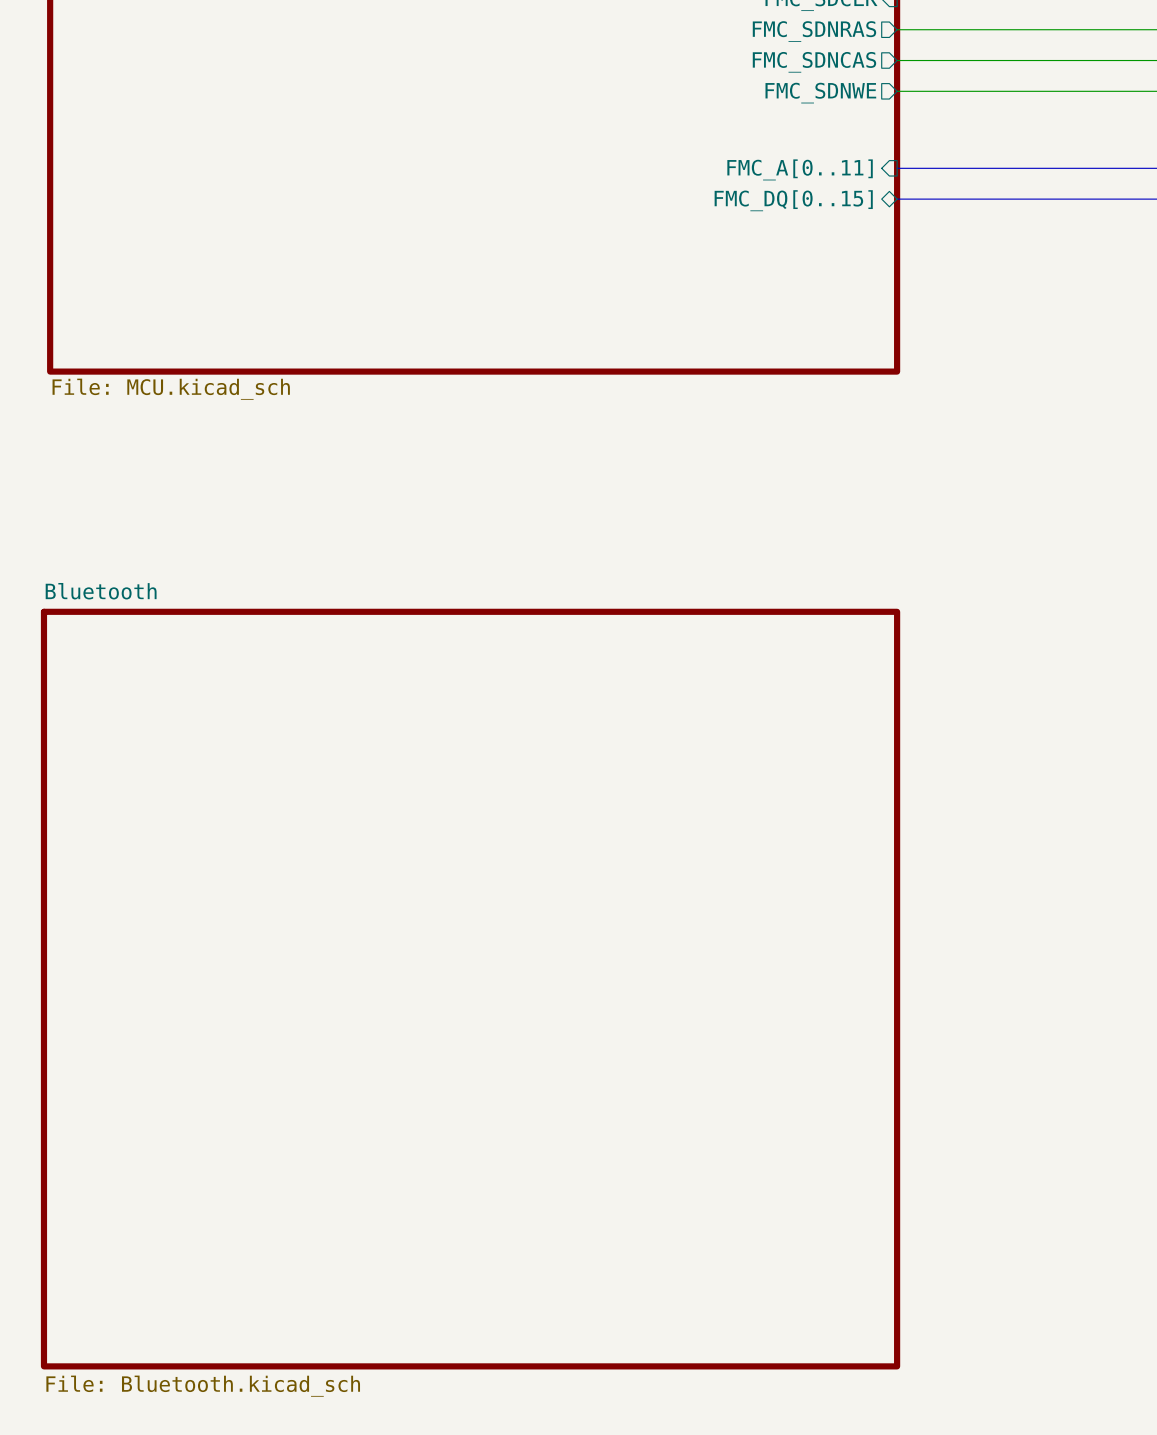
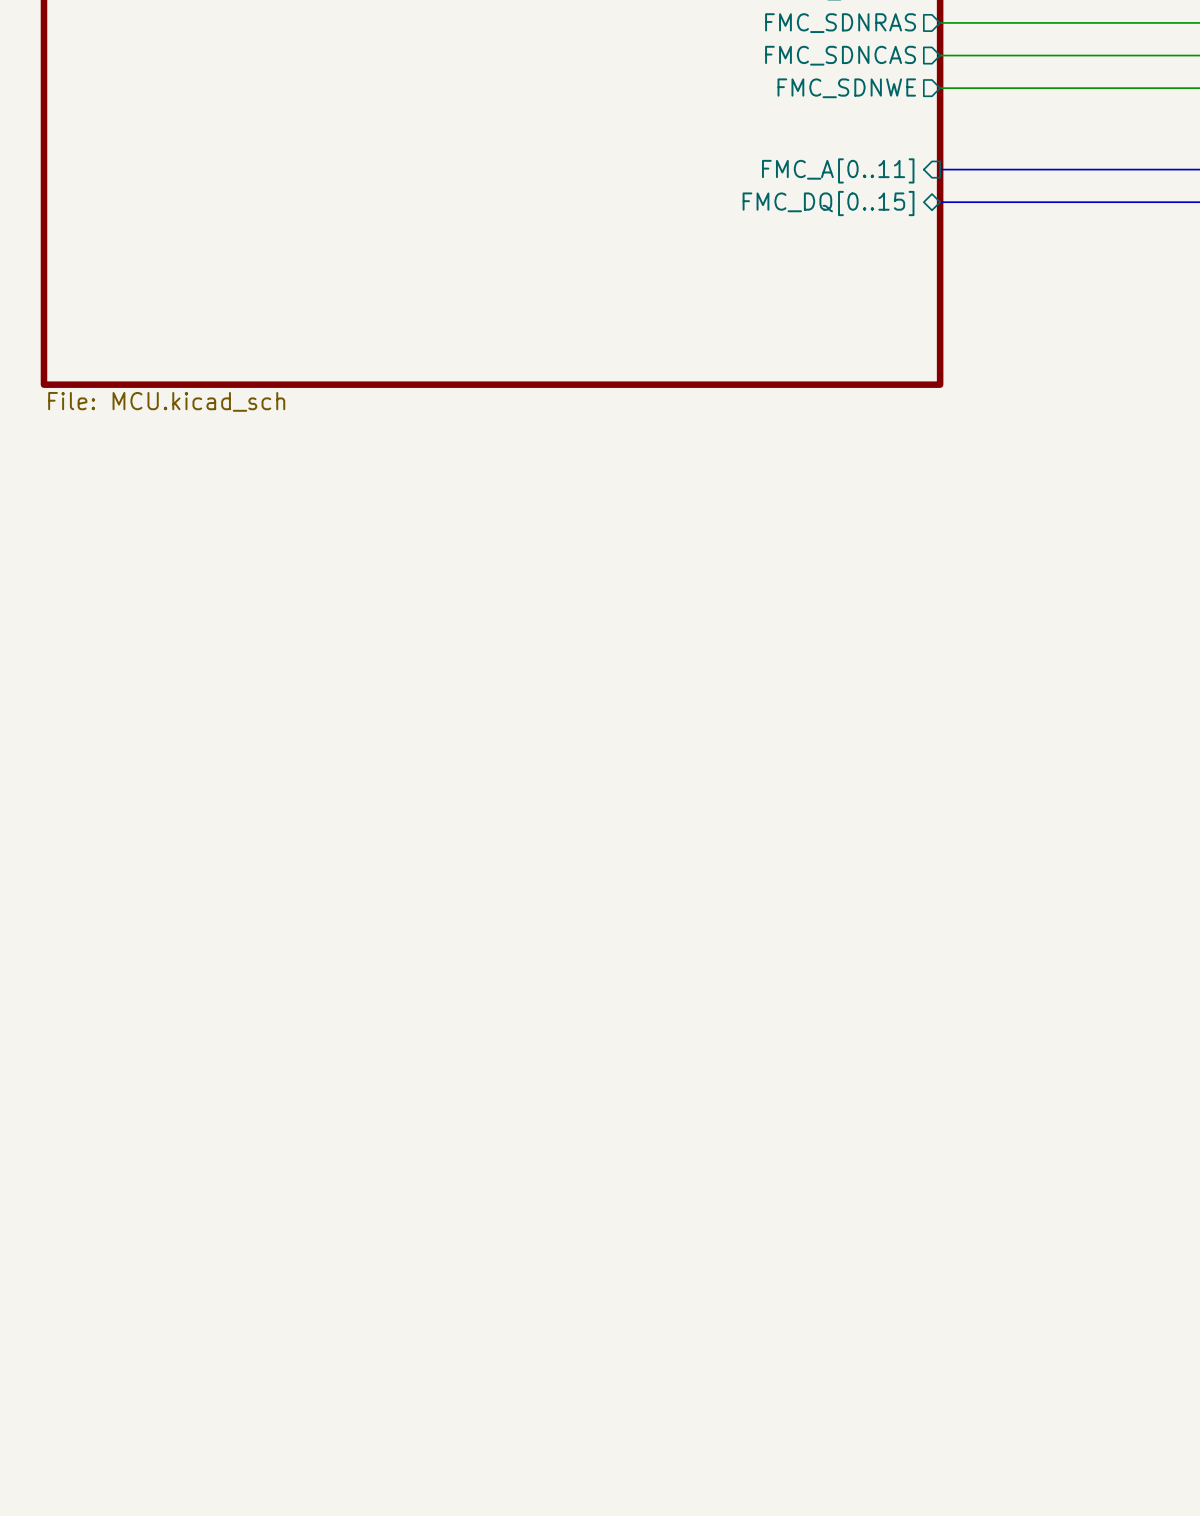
sheet Bluetooth: File: Bluetooth.kicad_sch (470, 989) -> none

